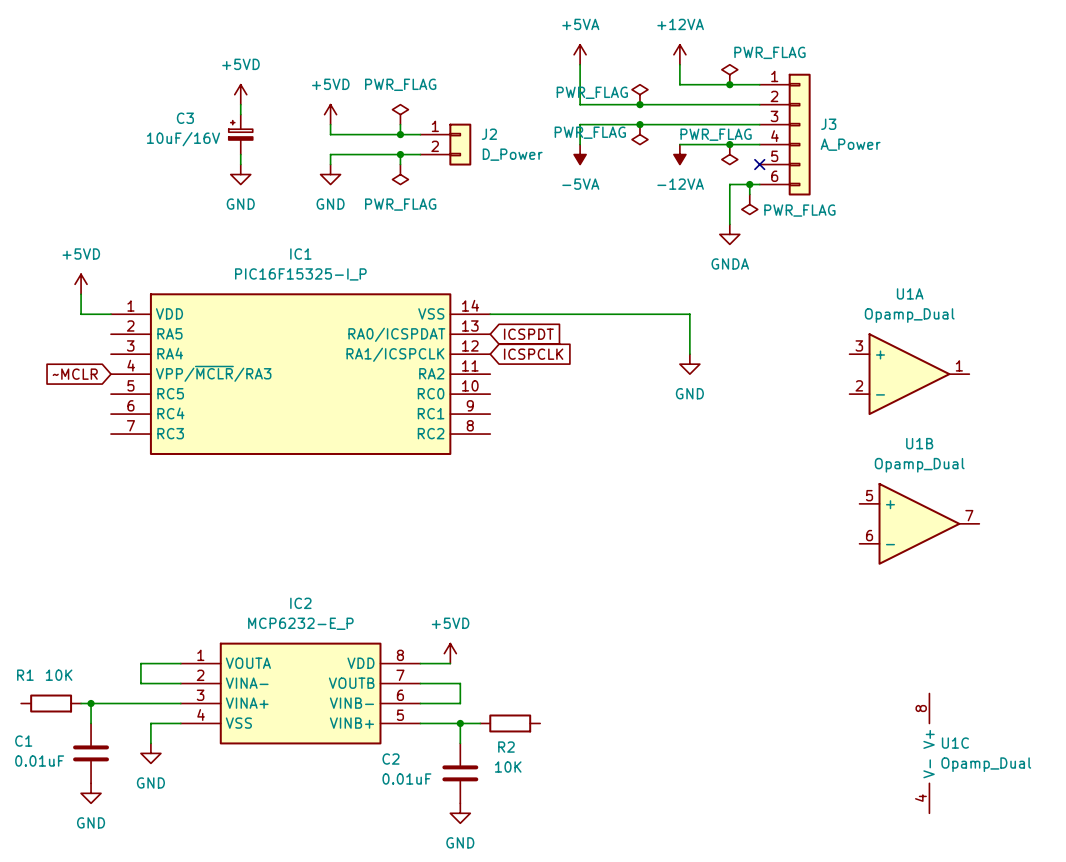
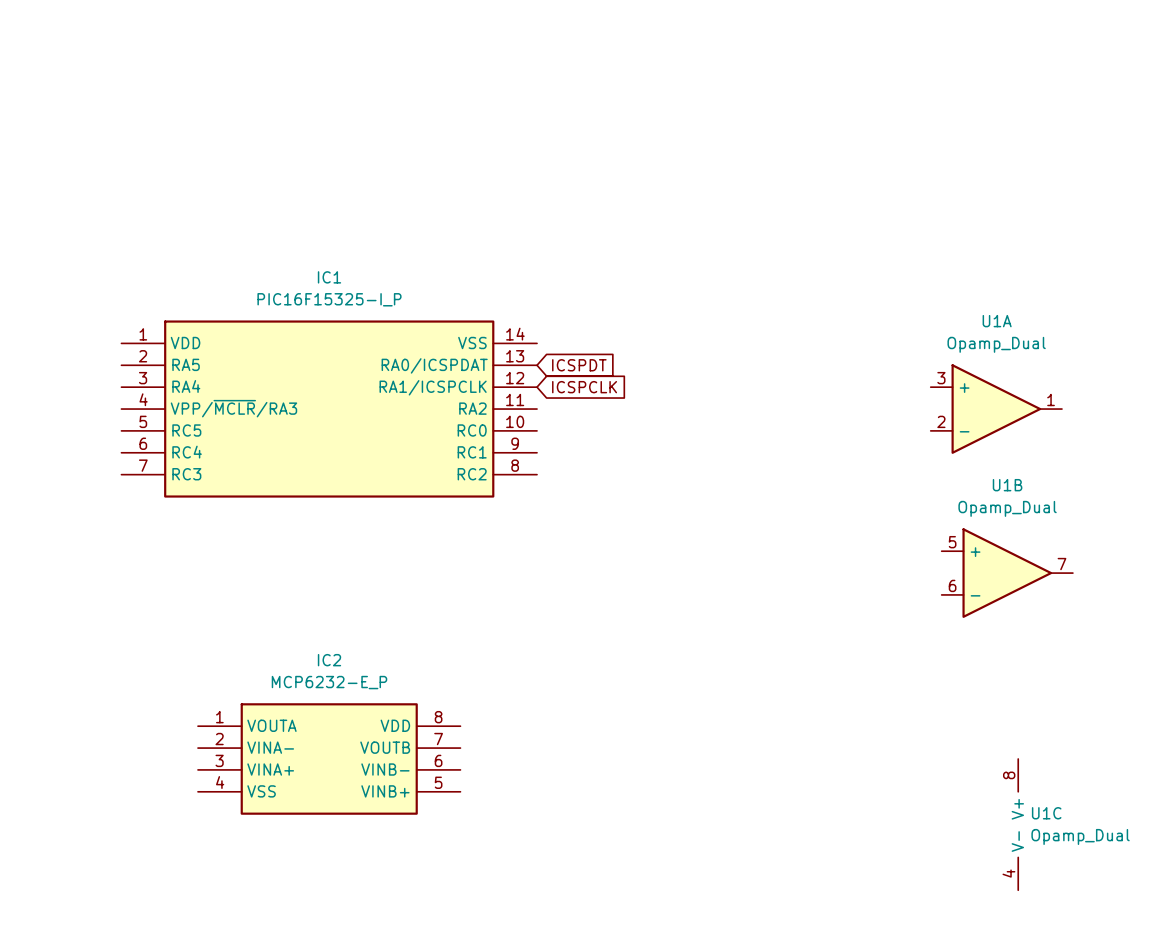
power symbol: +5VA (580, 54) -> none
power symbol: +12VA (679, 54) -> none
wire: (580, 64) (580, 104) (759, 104) -> none
wire: (679, 64) (679, 84) (759, 84) -> none
power symbol: PWR_FLAG (729, 74) -> none
junction: (729, 84) -> none
power symbol: +5VD (240, 94) -> none
power symbol: PWR_FLAG (639, 94) -> none
wire: (240, 104) (240, 114) -> none
junction: (639, 104) -> none
power symbol: +5VD (330, 114) -> none
power symbol: PWR_FLAG (400, 114) -> none
wire: (330, 124) (330, 134) (420, 134) -> none
wire: (400, 124) (400, 134) -> none
junction: (639, 124) -> none
wire: (759, 124) (580, 124) (580, 144) -> none
C3: 10uF/16V (240, 134) -> none
junction: (400, 134) -> none
power symbol: PWR_FLAG (639, 134) -> none
J3: A_Power (785, 134) -> none
J2: D_Power (445, 144) -> none
wire: (679, 144) (759, 144) -> none
junction: (729, 144) -> none
wire: (240, 154) (240, 164) -> none
wire: (400, 154) (400, 164) -> none
junction: (400, 154) -> none
wire: (420, 154) (330, 154) (330, 164) -> none
power symbol: -5VA (580, 154) -> none
power symbol: -12VA (679, 154) -> none
power symbol: PWR_FLAG (729, 154) -> none
no-connect mark: (759, 164) -> none
power symbol: GND (240, 174) -> none
power symbol: GND (330, 174) -> none
power symbol: PWR_FLAG (400, 174) -> none
wire: (749, 184) (749, 194) -> none
junction: (749, 184) -> none
wire: (759, 184) (729, 184) (729, 224) -> none
power symbol: PWR_FLAG (749, 204) -> none
power symbol: GNDA (729, 234) -> none
power symbol: +5VD (81, 284) -> none
wire: (81, 294) (81, 314) (111, 314) -> none
wire: (490, 314) (689, 314) (689, 354) -> none
power symbol: GND (689, 364) -> none
global label: ~MCLR (75, 374) -> none
power symbol: +5VD (450, 653) -> none
wire: (180, 663) (140, 663) (140, 683) (180, 683) -> none
wire: (420, 663) (450, 663) -> none
wire: (420, 683) (460, 683) (460, 703) (420, 703) -> none
R1: 10K (51, 703) -> none
wire: (81, 703) (180, 703) -> none
wire: (91, 703) (91, 723) -> none
junction: (91, 703) -> none
wire: (180, 723) (150, 723) (150, 743) -> none
wire: (420, 723) (480, 723) -> none
wire: (460, 723) (460, 743) -> none
junction: (460, 723) -> none
R2: 10K (510, 723) -> none
C1: 0.01uF (91, 753) -> none
power symbol: GND (150, 753) -> none
C2: 0.01uF (460, 773) -> none
power symbol: GND (91, 793) -> none
power symbol: GND (460, 813) -> none

